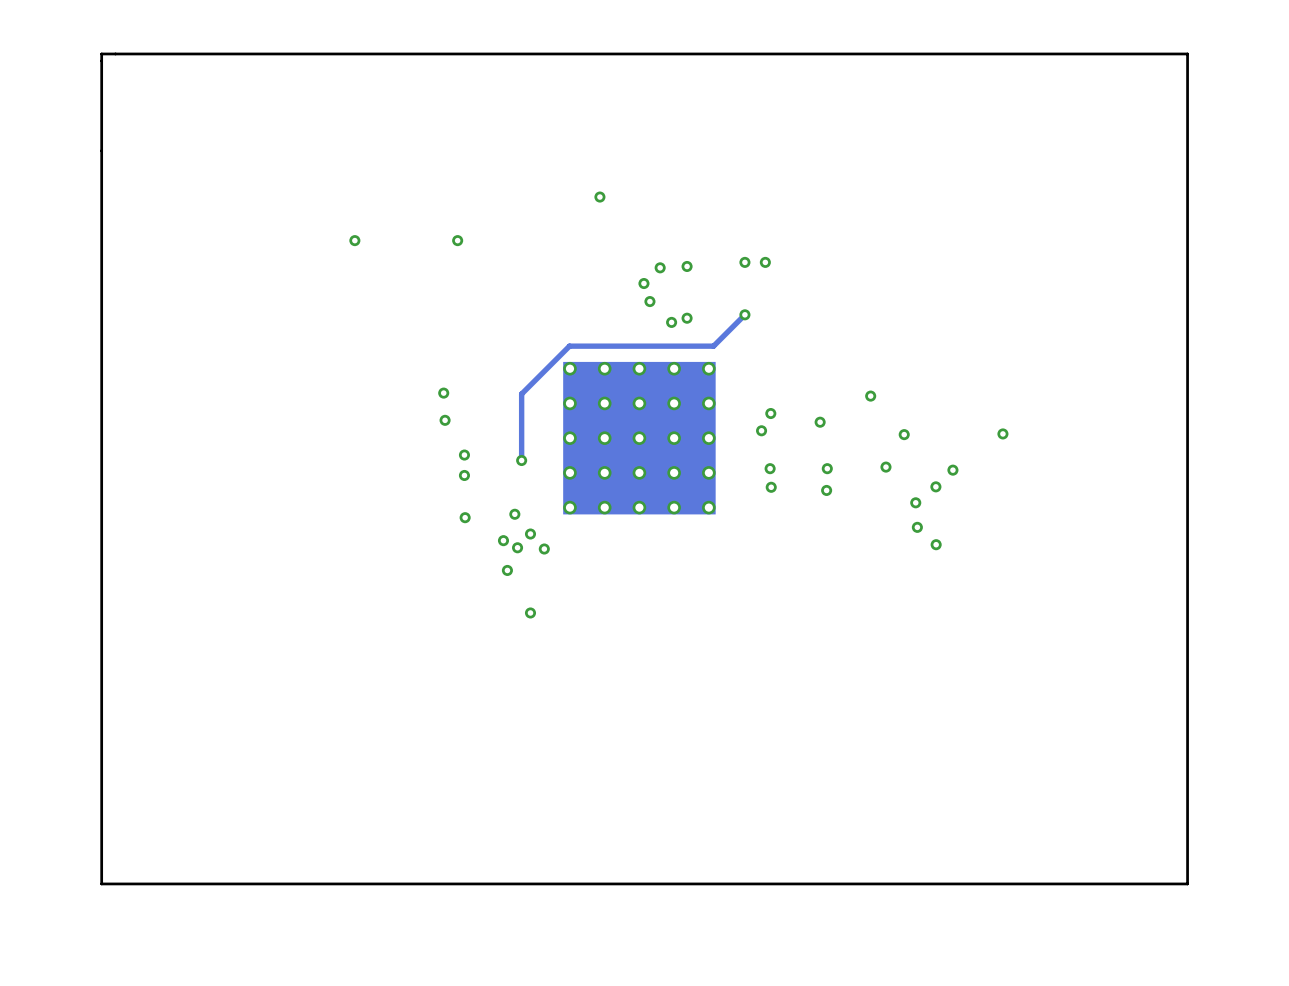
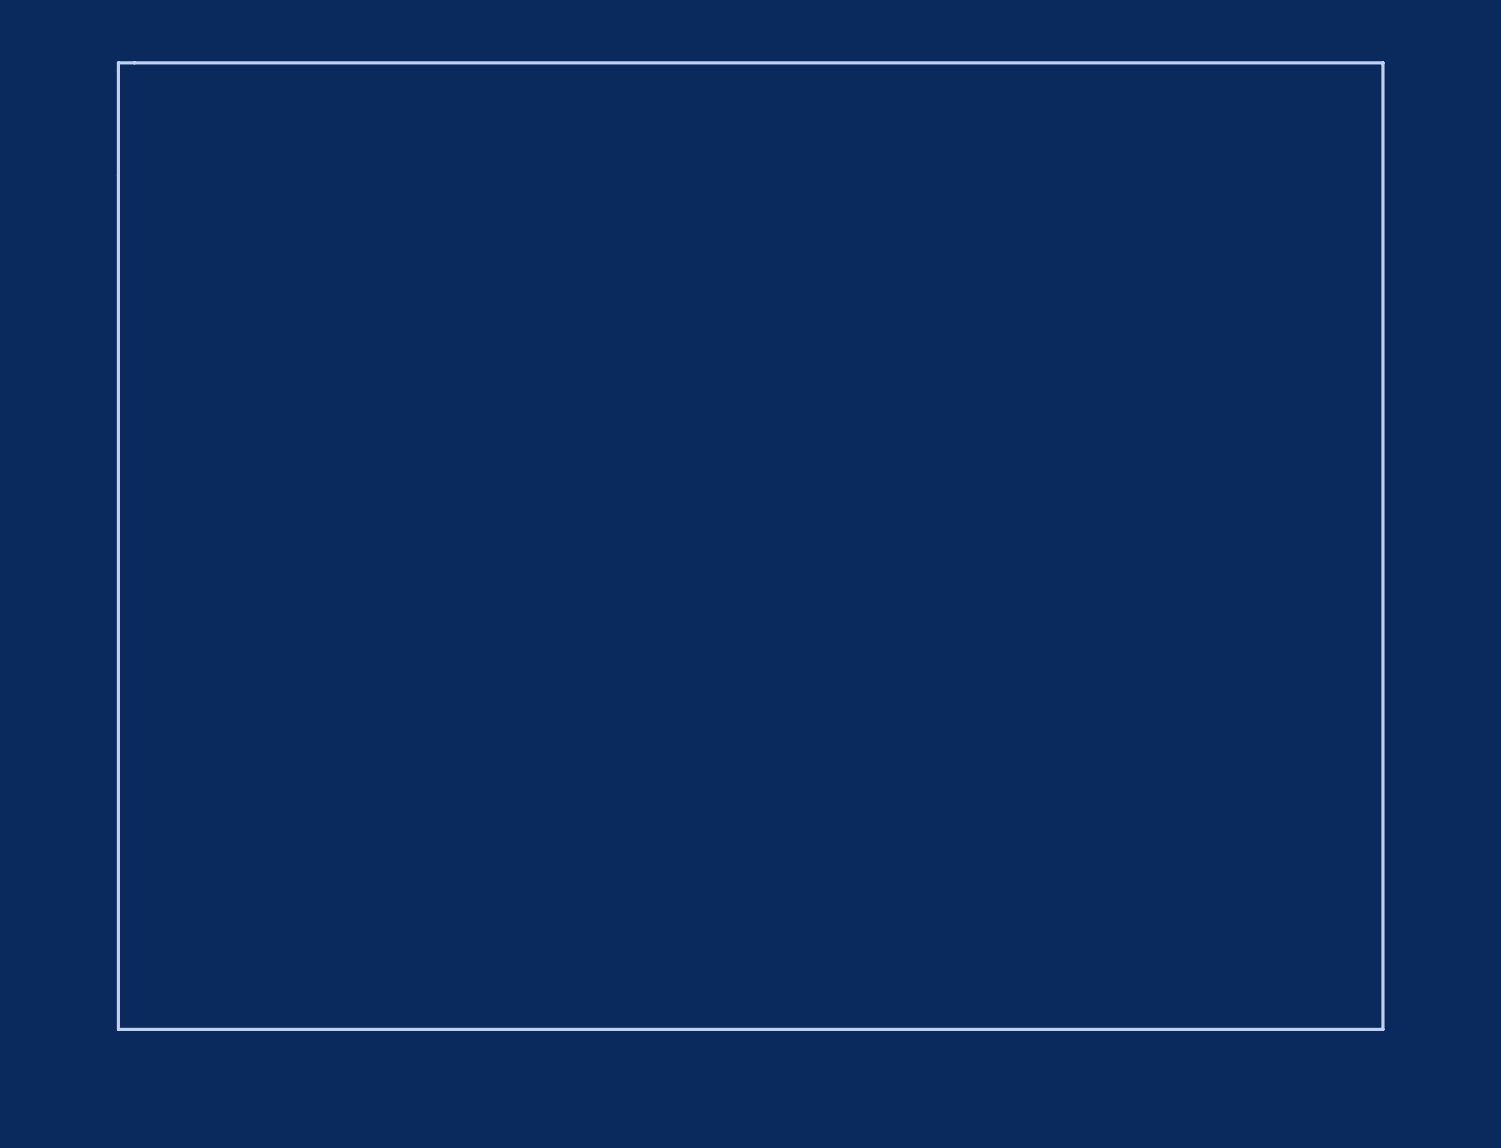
via: (599, 197) -> none
via: (354, 240) -> none
via: (457, 240) -> none
via: (744, 262) -> none
via: (765, 262) -> none
via: (687, 266) -> none
via: (660, 267) -> none
via: (643, 283) -> none
via: (649, 301) -> none
track: (744, 314) (713, 346) (569, 346) (521, 394) (521, 460) -> none
via: (744, 314) -> none
via: (687, 318) -> none
via: (671, 322) -> none
via: (443, 393) -> none
via: (870, 396) -> none
via: (770, 413) -> none
via: (445, 420) -> none
via: (820, 422) -> none
via: (761, 430) -> none
via: (1002, 433) -> none
via: (904, 434) -> none
part: (639, 438) -> none
via: (464, 455) -> none
via: (521, 460) -> none
via: (885, 467) -> none
via: (770, 468) -> none
via: (827, 468) -> none
via: (952, 470) -> none
via: (464, 475) -> none
via: (935, 486) -> none
via: (771, 487) -> none
via: (826, 490) -> none
via: (915, 502) -> none
via: (514, 514) -> none
via: (465, 517) -> none
via: (917, 527) -> none
via: (530, 534) -> none
via: (503, 540) -> none
via: (936, 544) -> none
via: (517, 547) -> none
via: (544, 549) -> none
via: (507, 570) -> none
via: (530, 612) -> none

